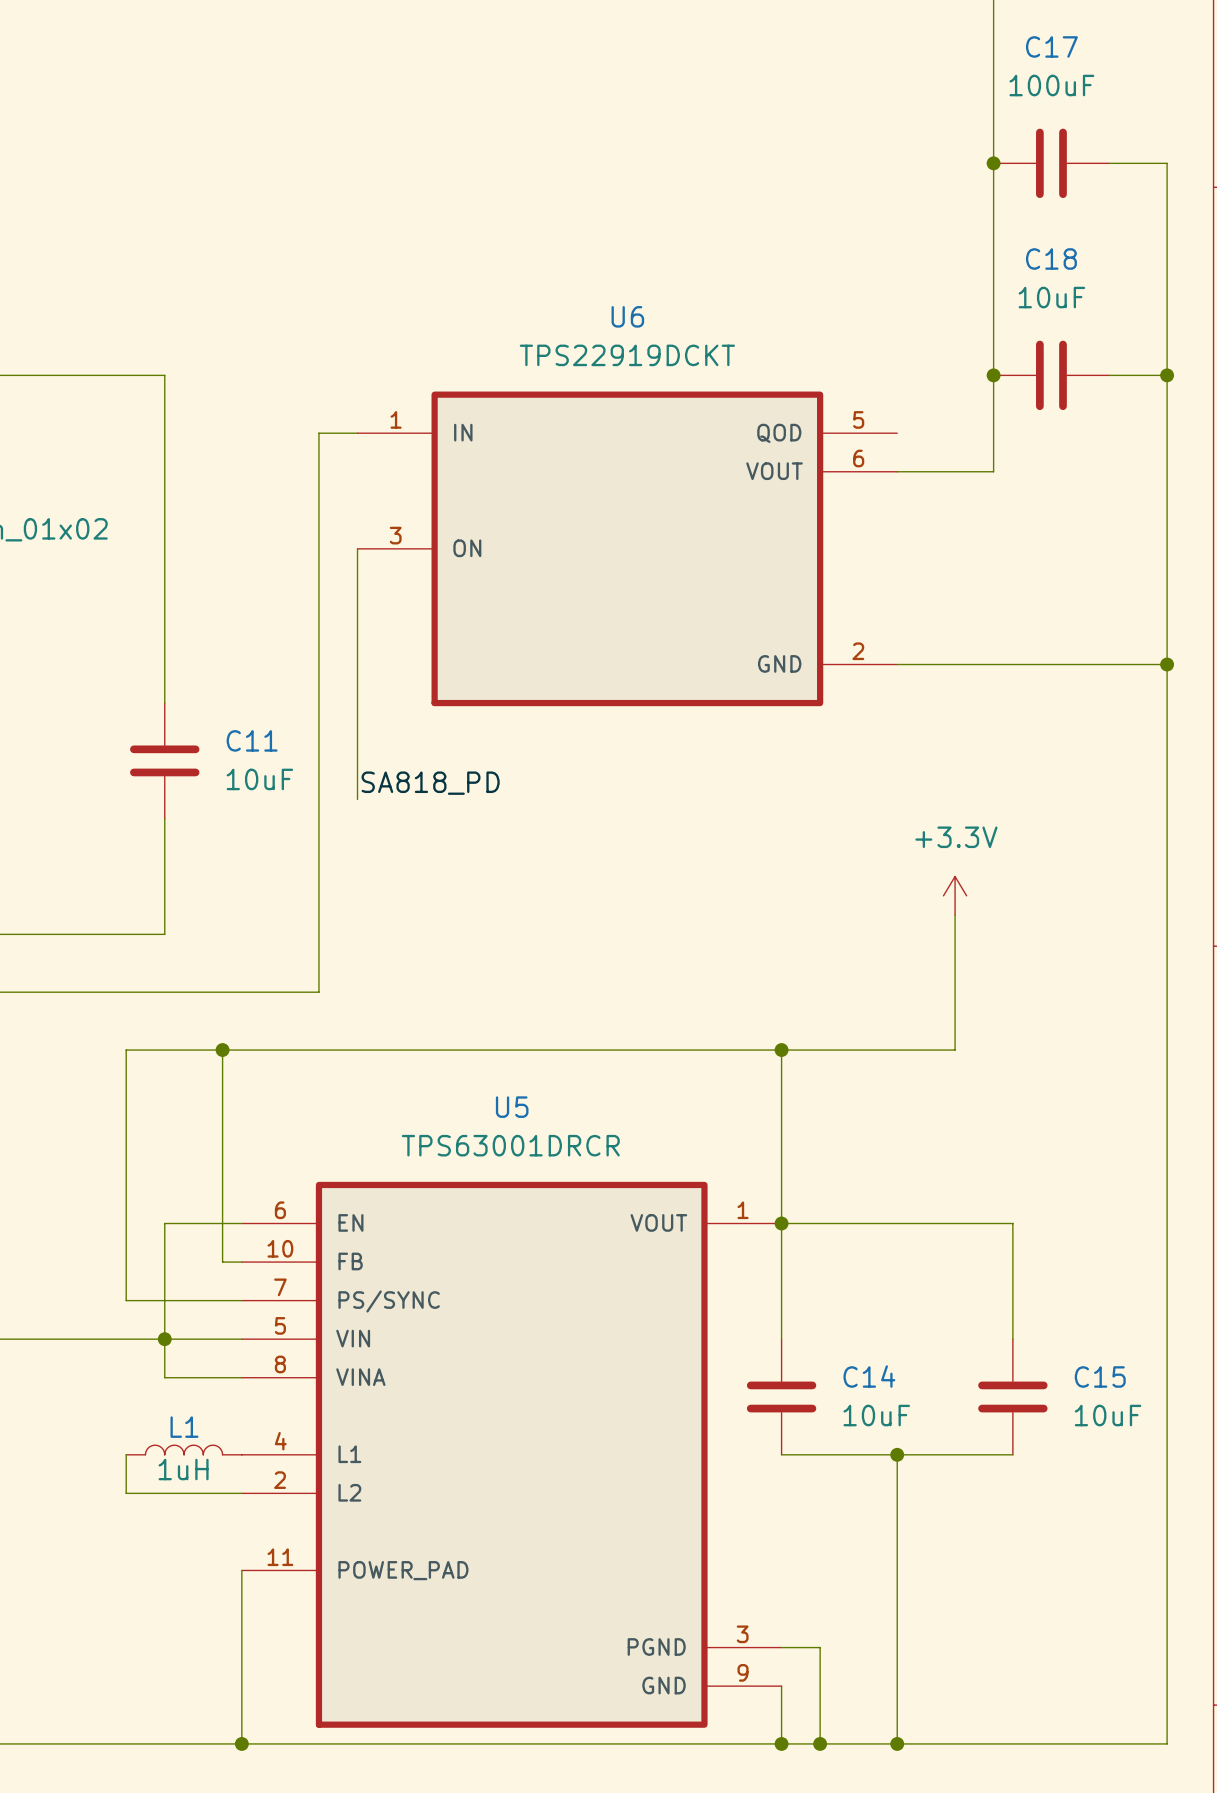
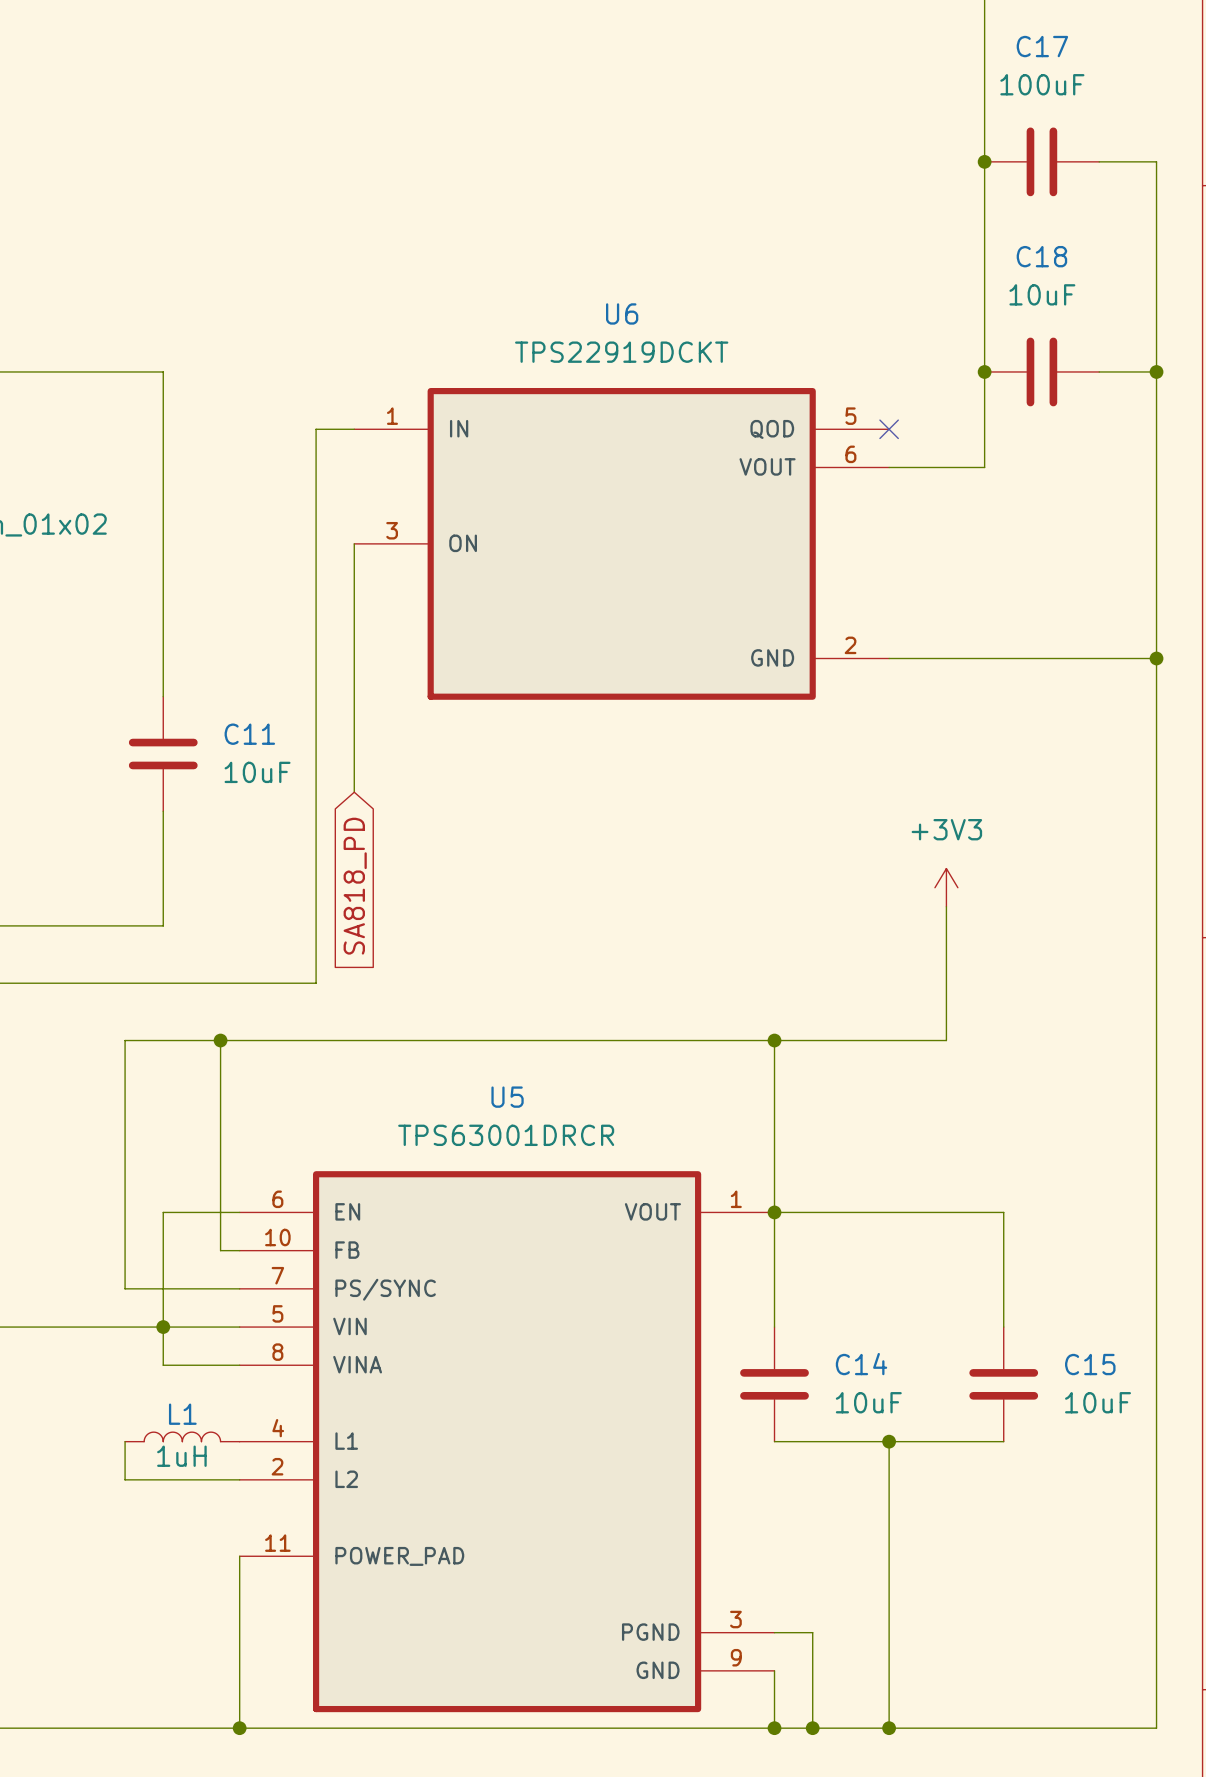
no-connect mark: none -> (889, 429)
label: SA818_PD (430, 783) -> none
global label: none -> SA818_PD (355, 886)
power symbol: +3.3V (955, 895) -> +3V3 (946, 887)

